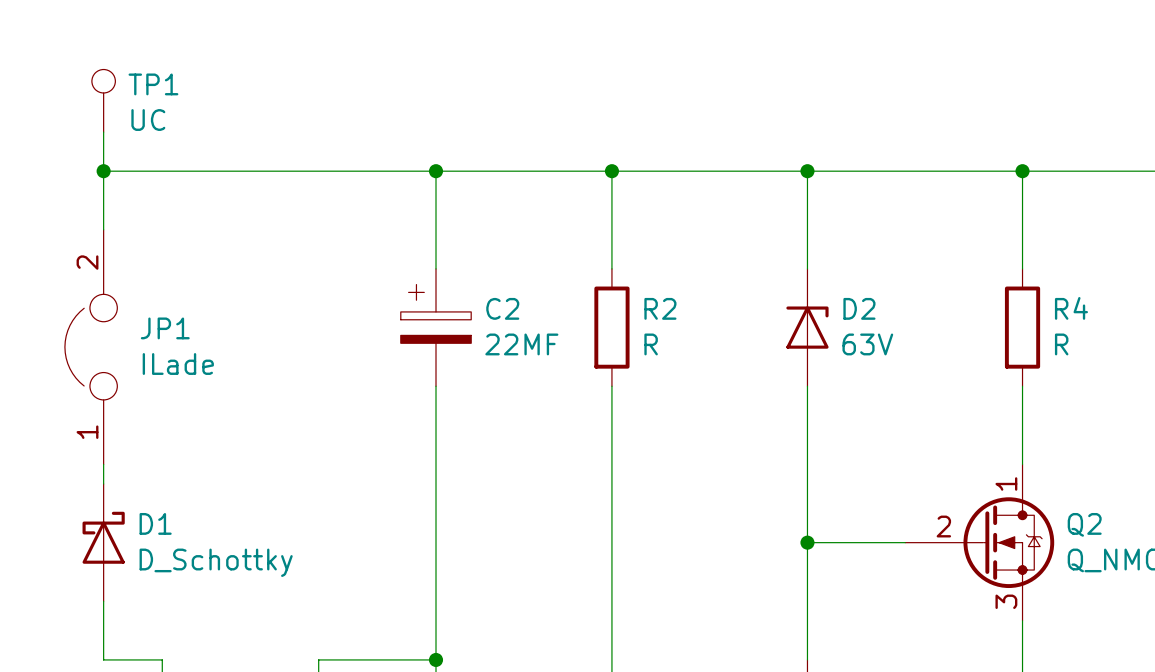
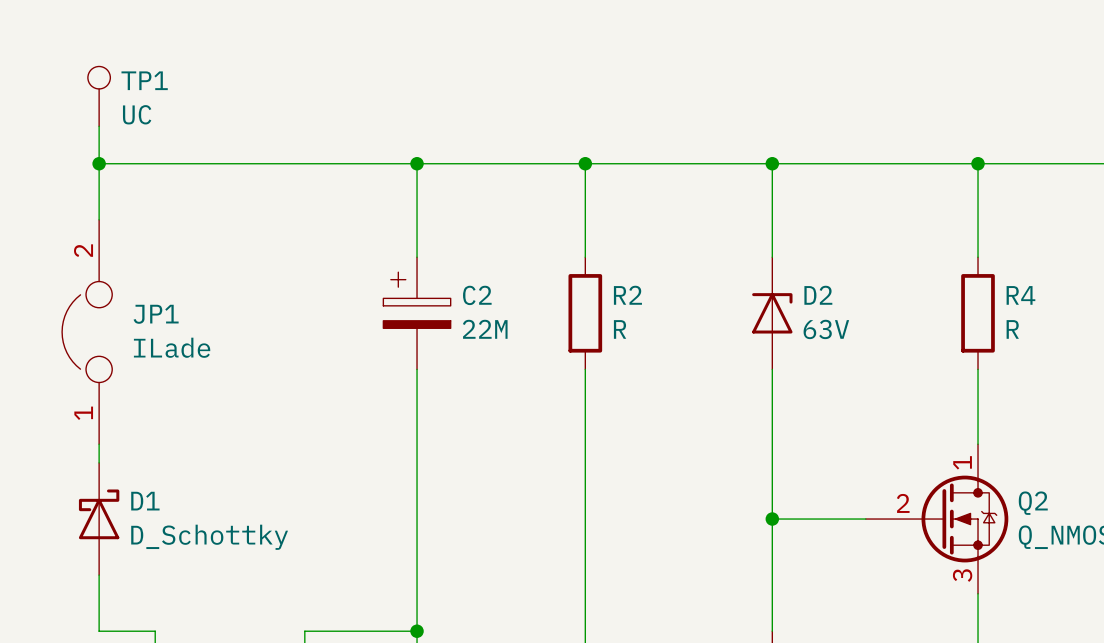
C2 value: 22MF (521, 344) -> 22M (485, 329)

